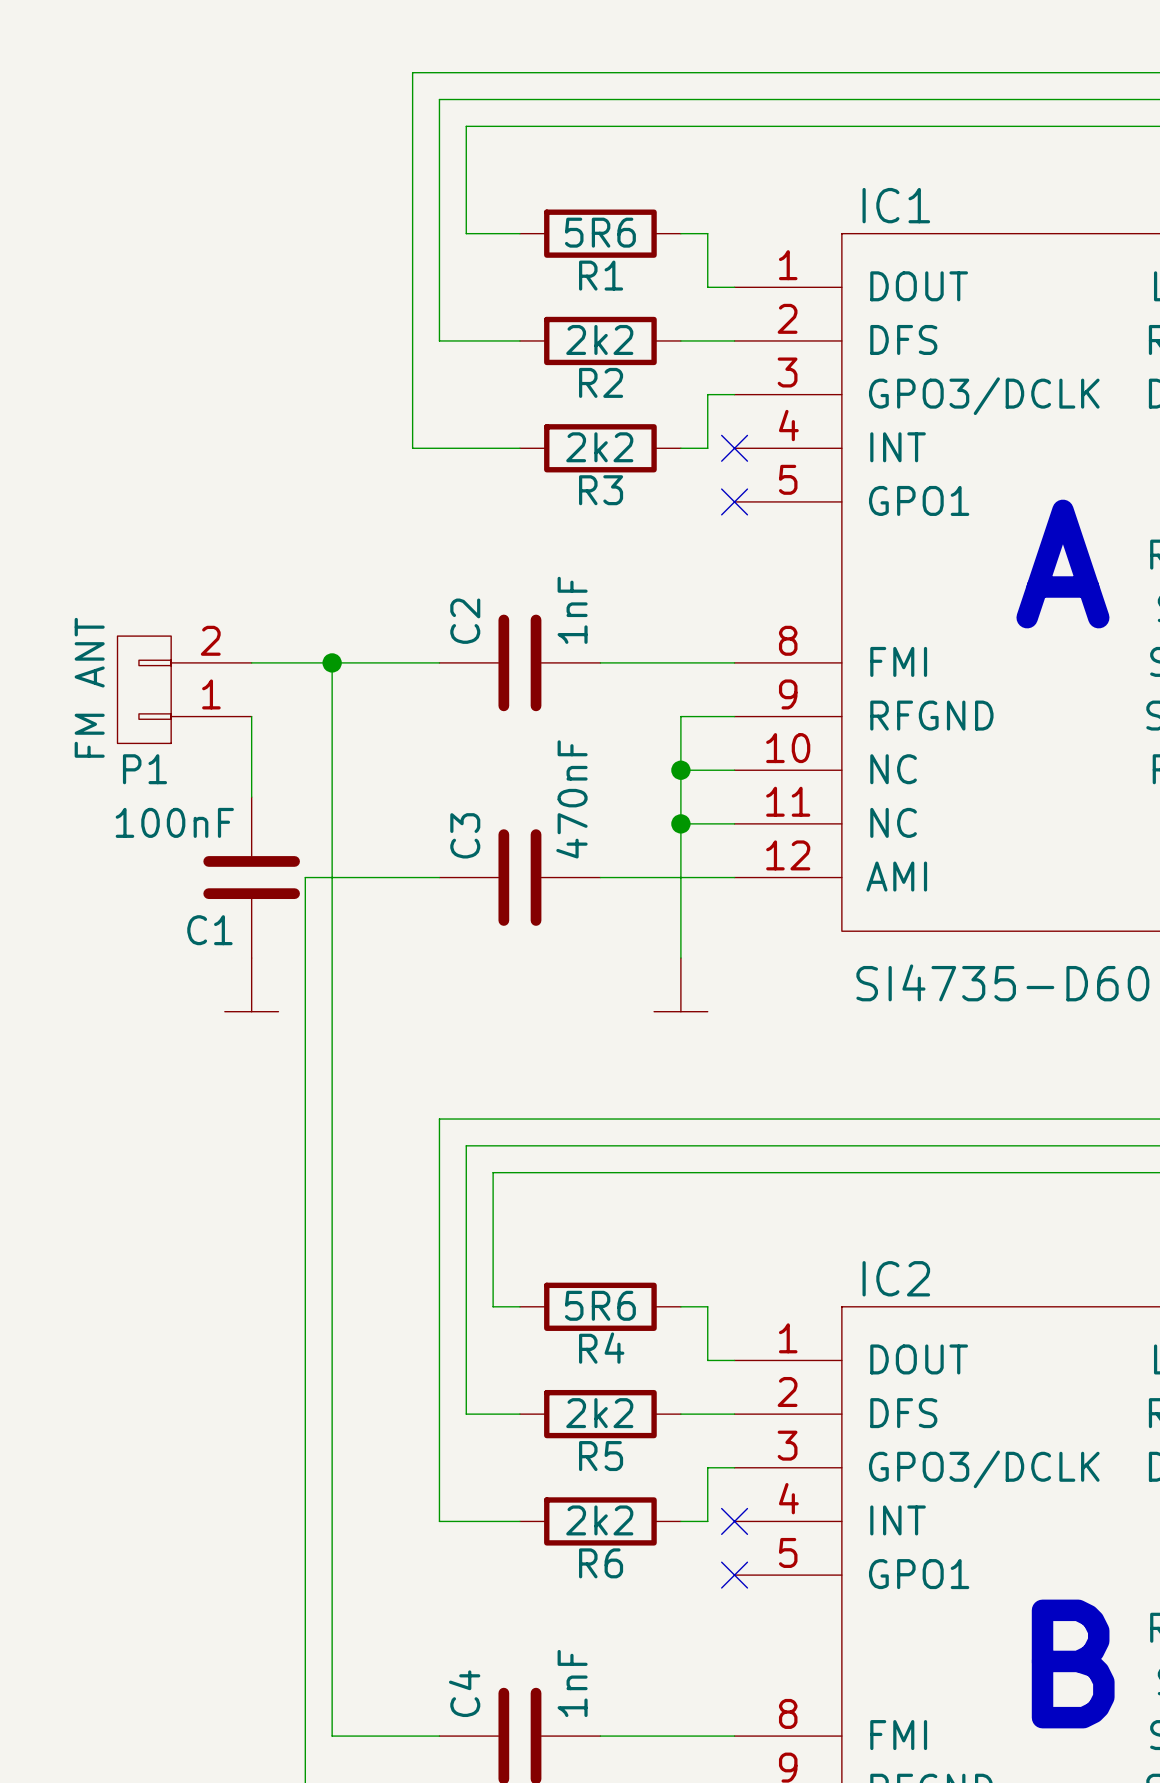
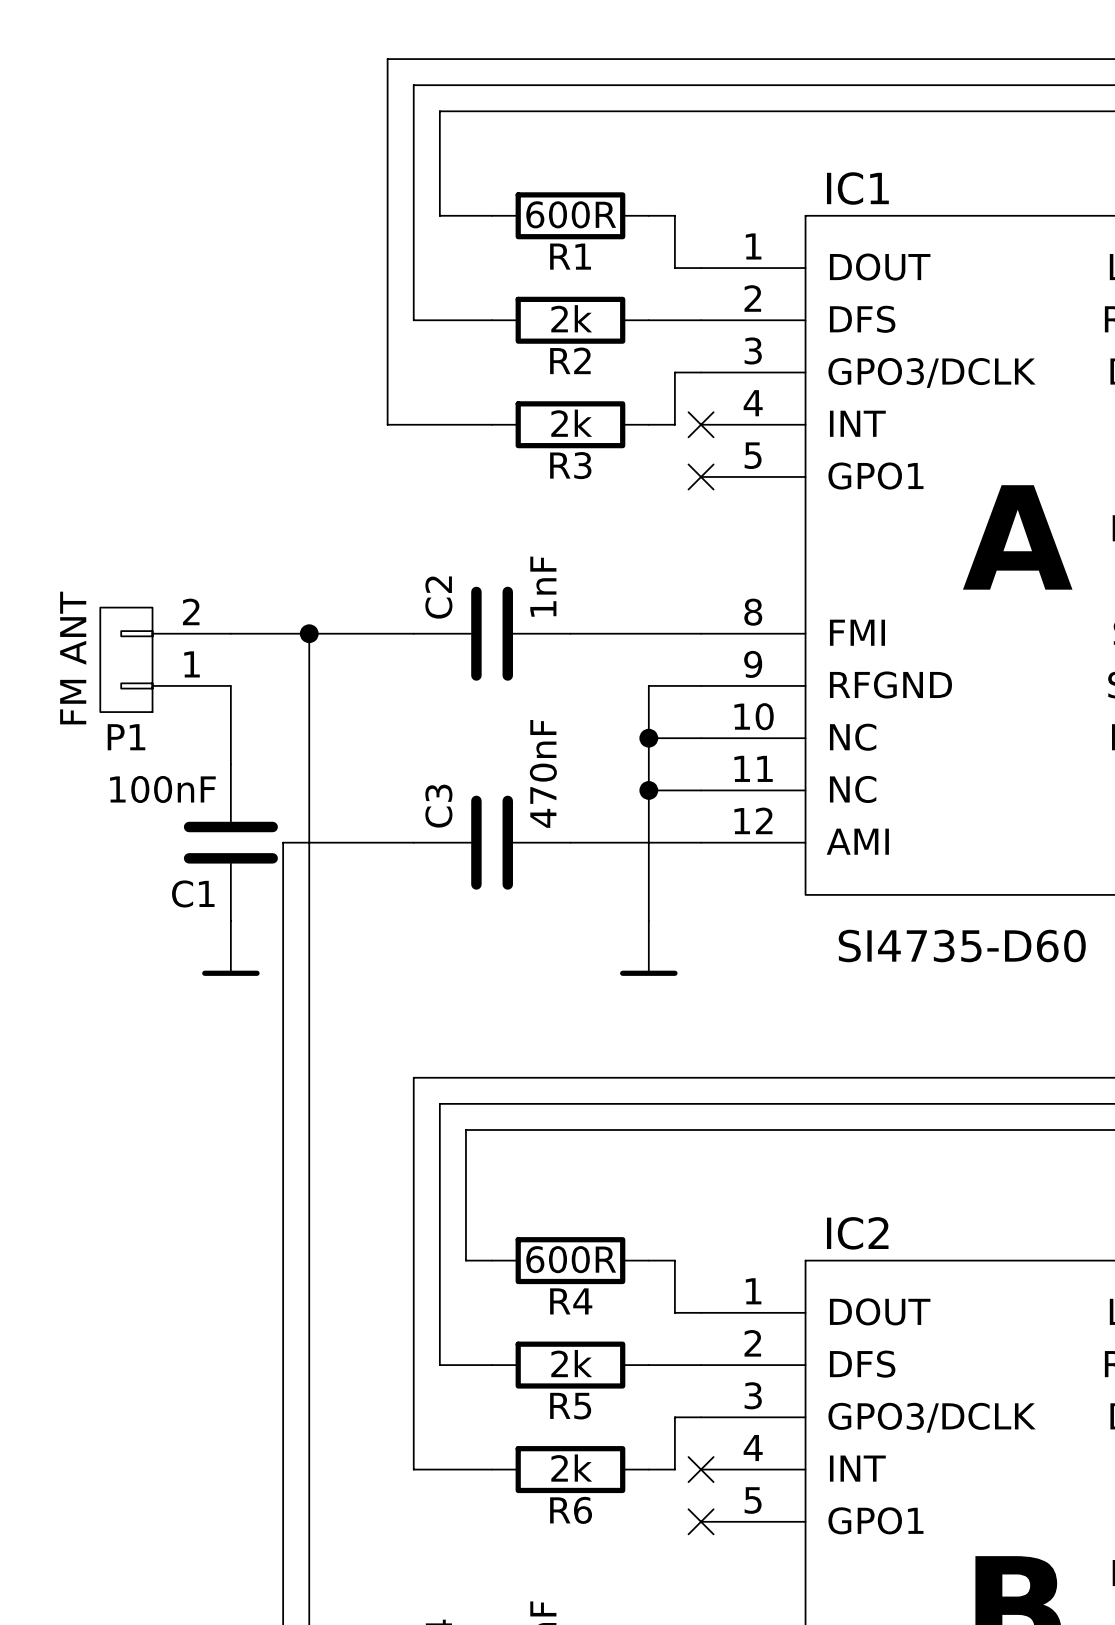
R1 value: 5R6 (600, 232) -> 600R (571, 214)
R2 value: 2k2 (599, 339) -> 2k (571, 318)
R3 value: 2k2 (599, 447) -> 2k (571, 423)
power symbol shape: [224, 958, 279, 1012] -> [202, 921, 260, 976]
power symbol shape: [654, 958, 708, 1012] -> [620, 921, 678, 976]
R4 value: 5R6 (600, 1305) -> 600R (571, 1259)
R5 value: 2k2 (599, 1413) -> 2k (571, 1363)
R6 value: 2k2 (599, 1520) -> 2k (571, 1468)

